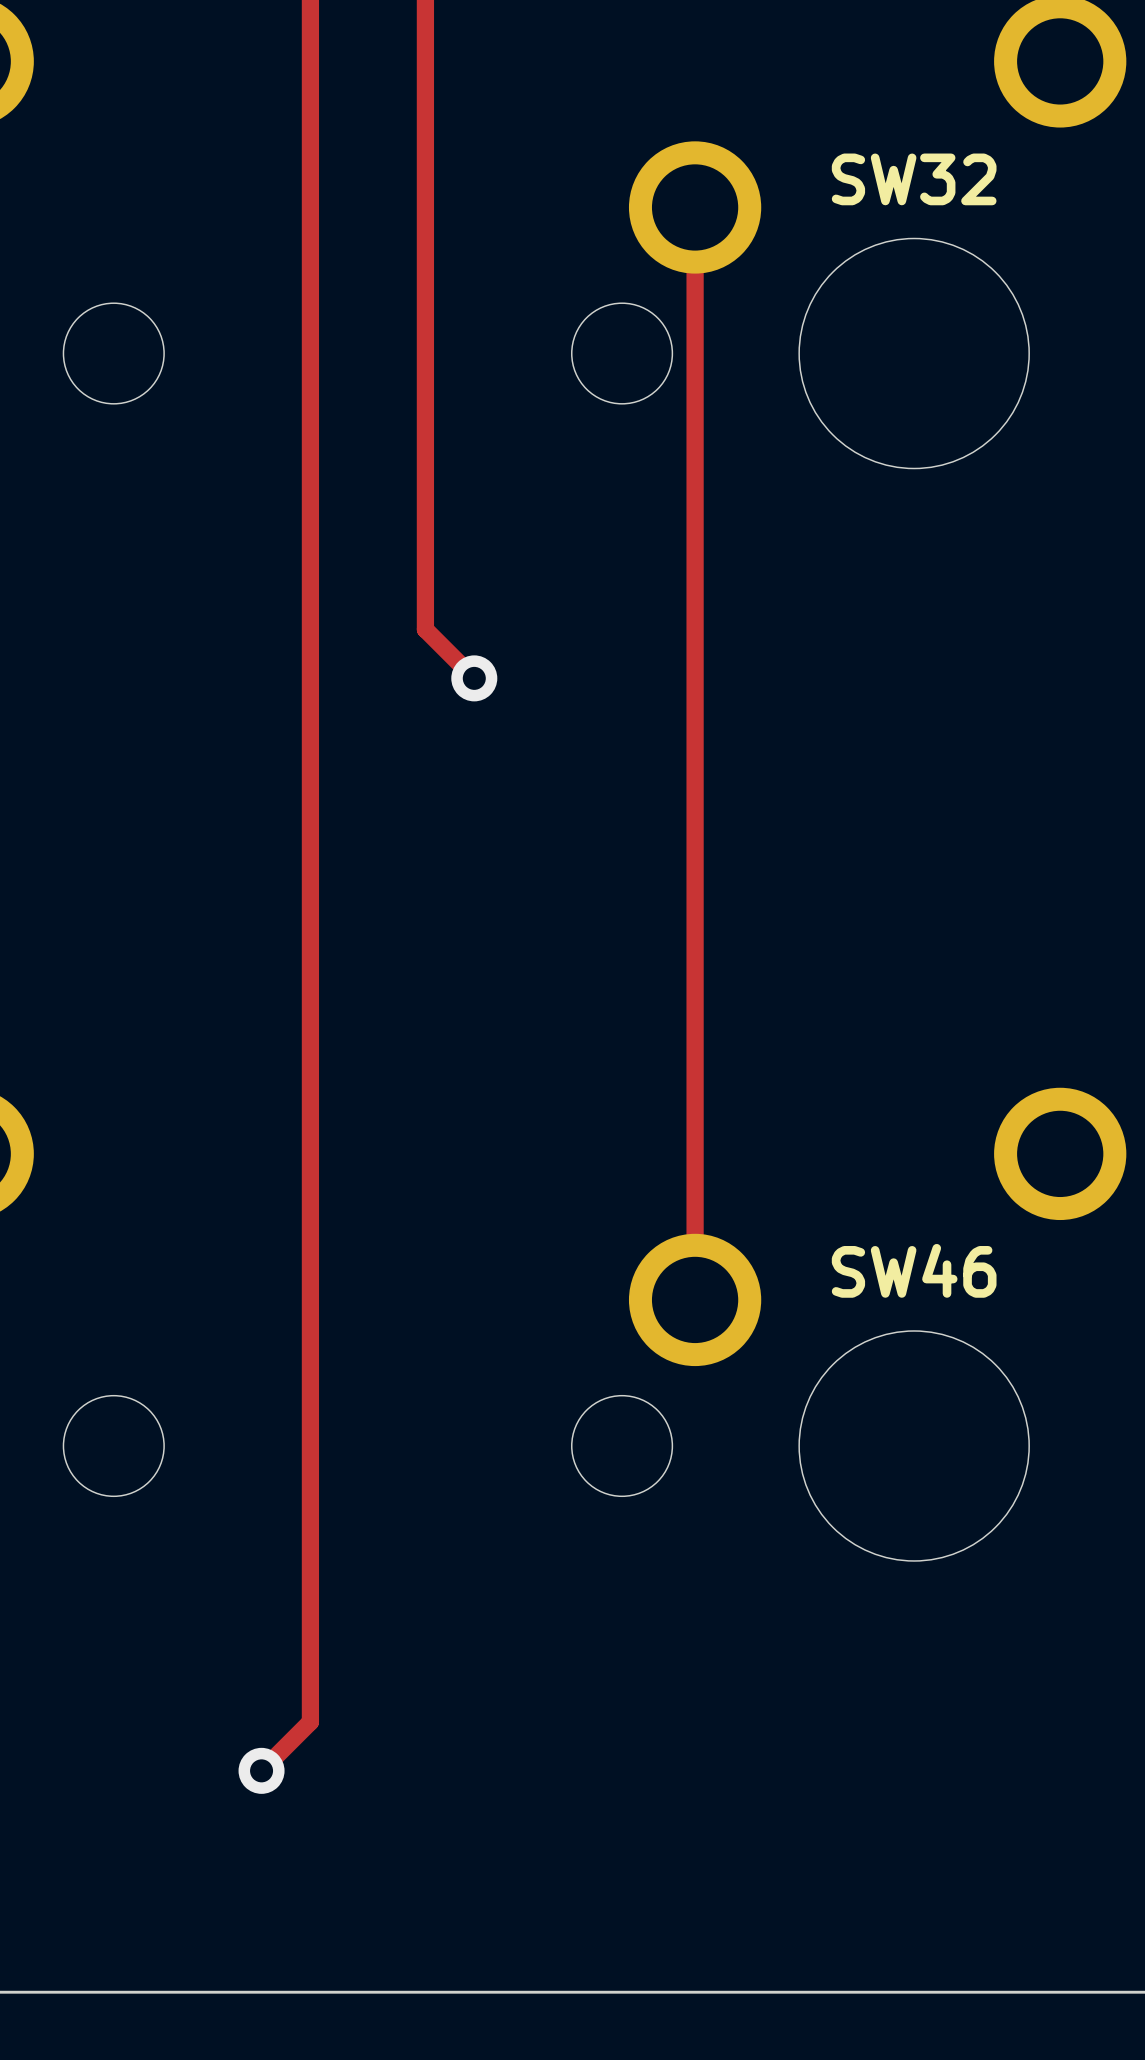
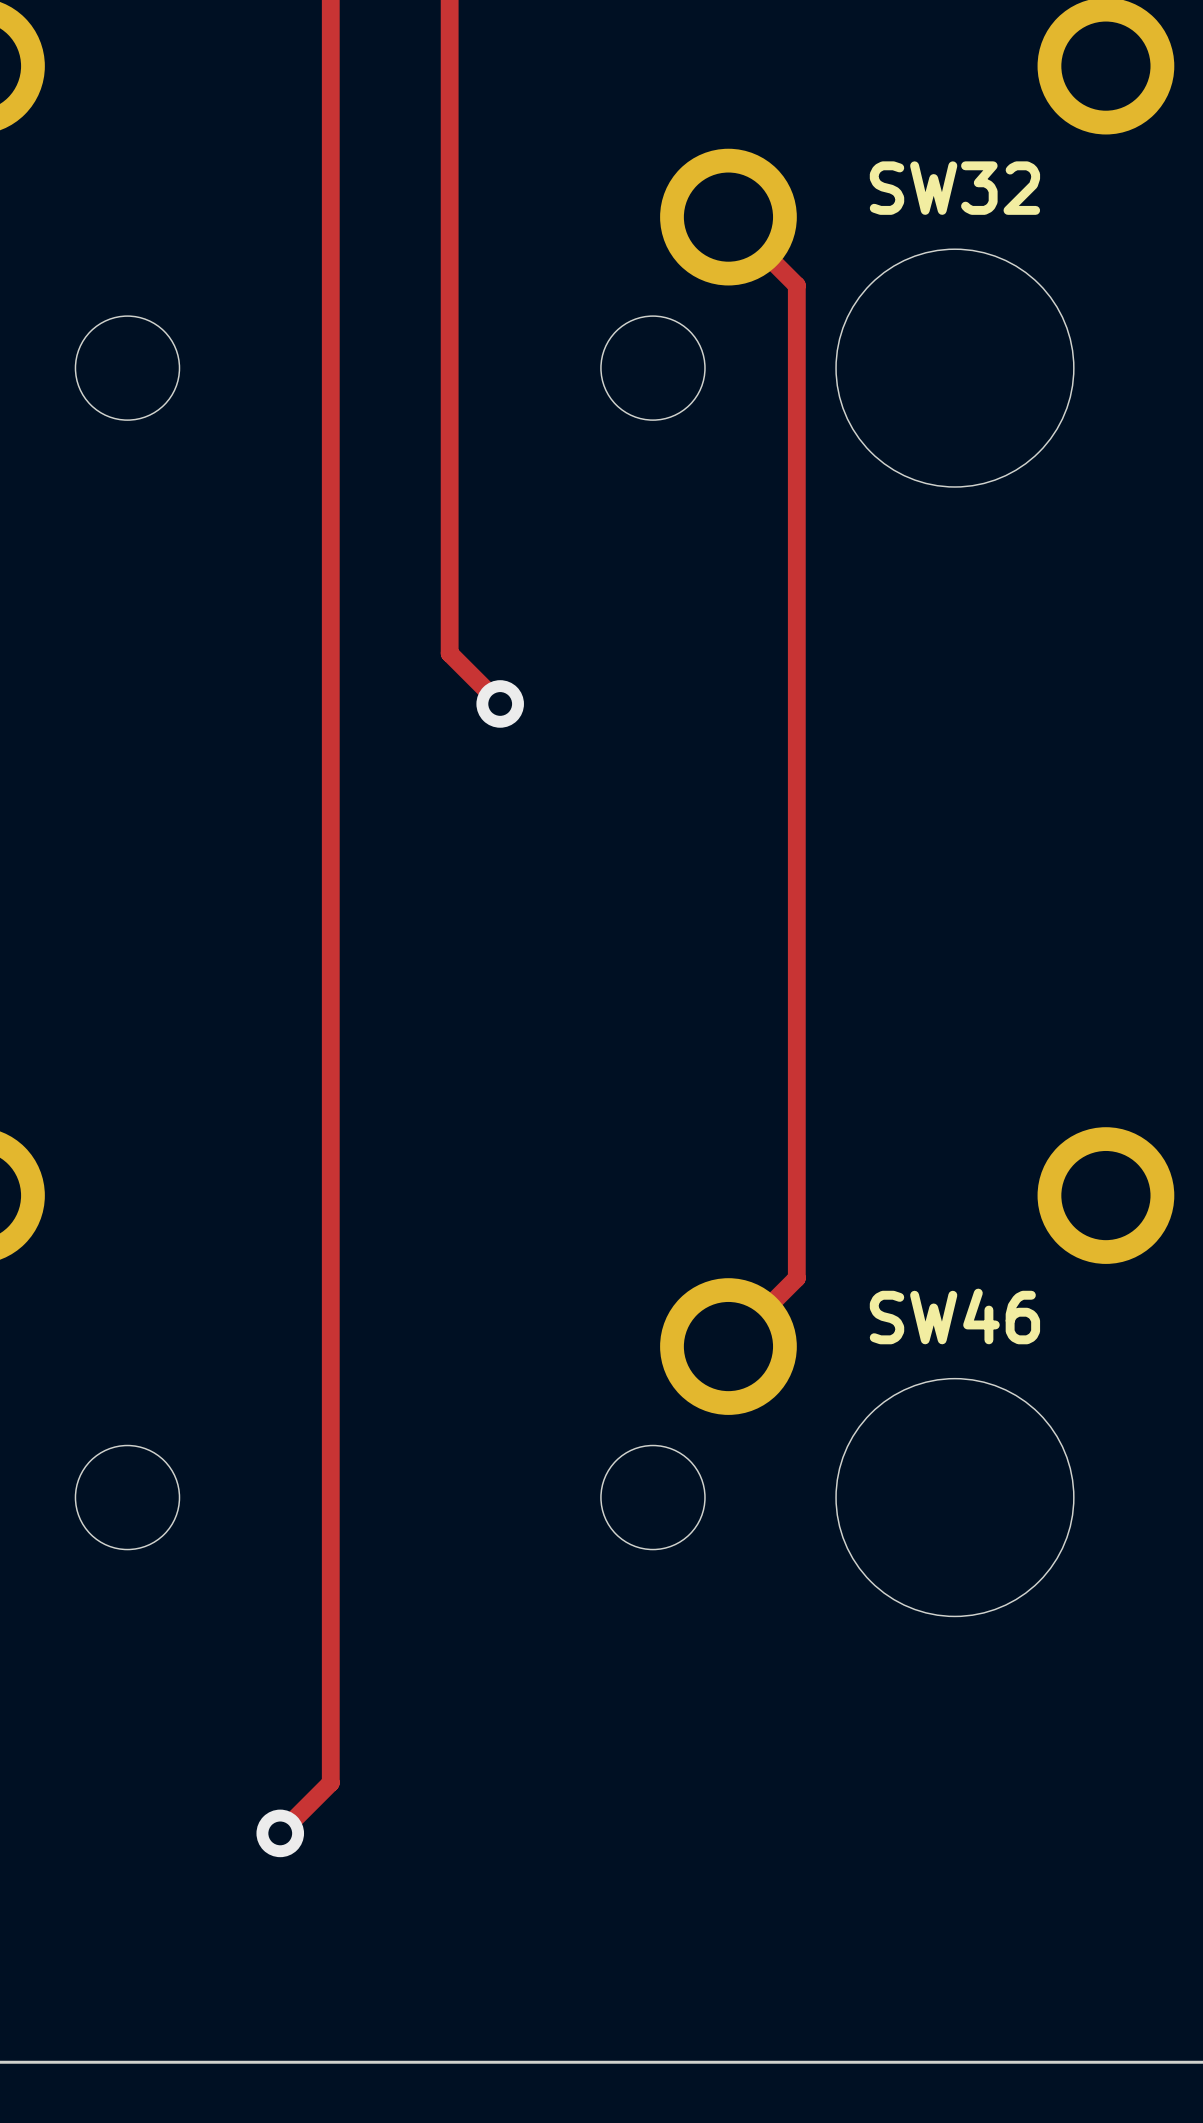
track: (695, 207) (695, 1299) -> (728, 217) (796, 285) (796, 1278) (728, 1346)

